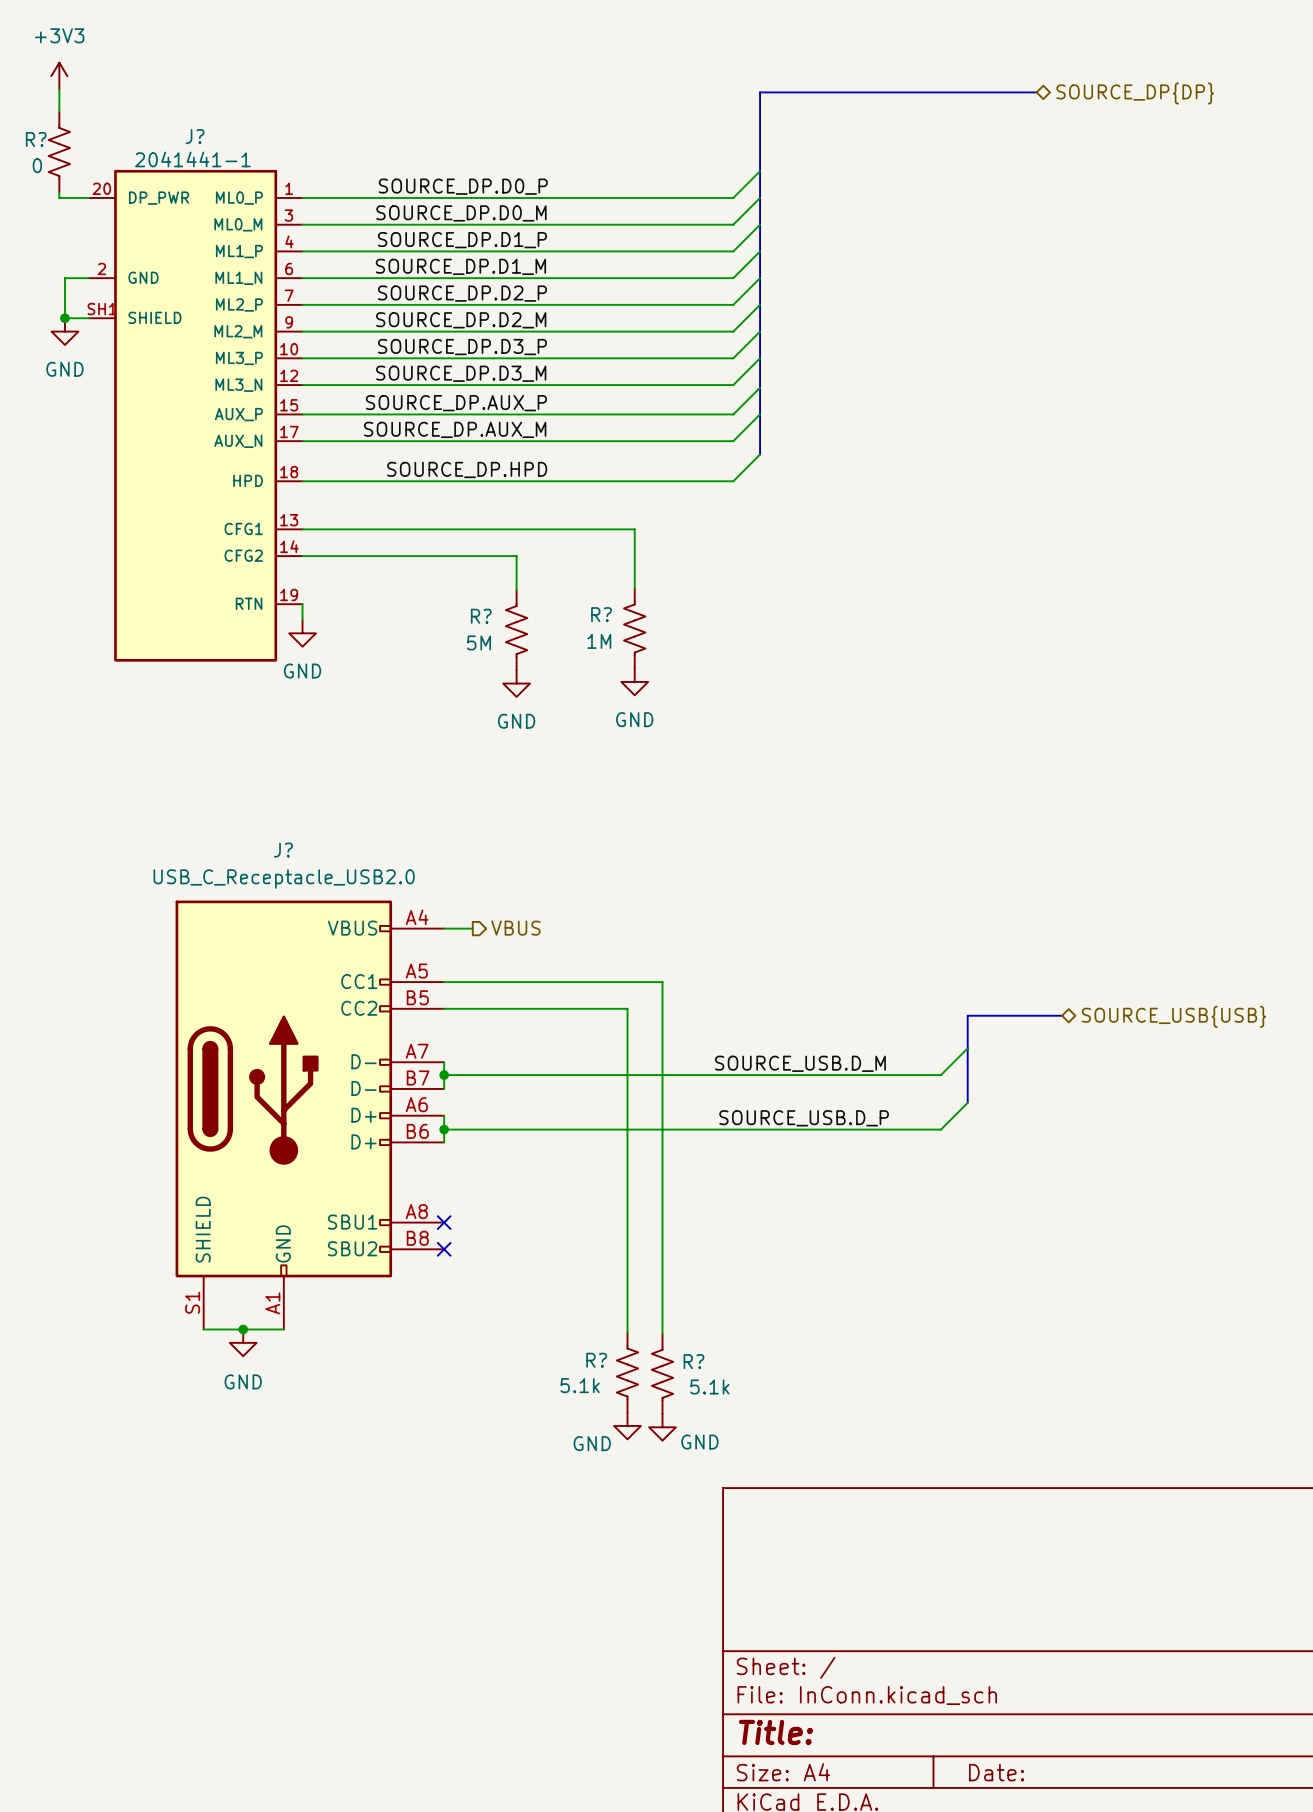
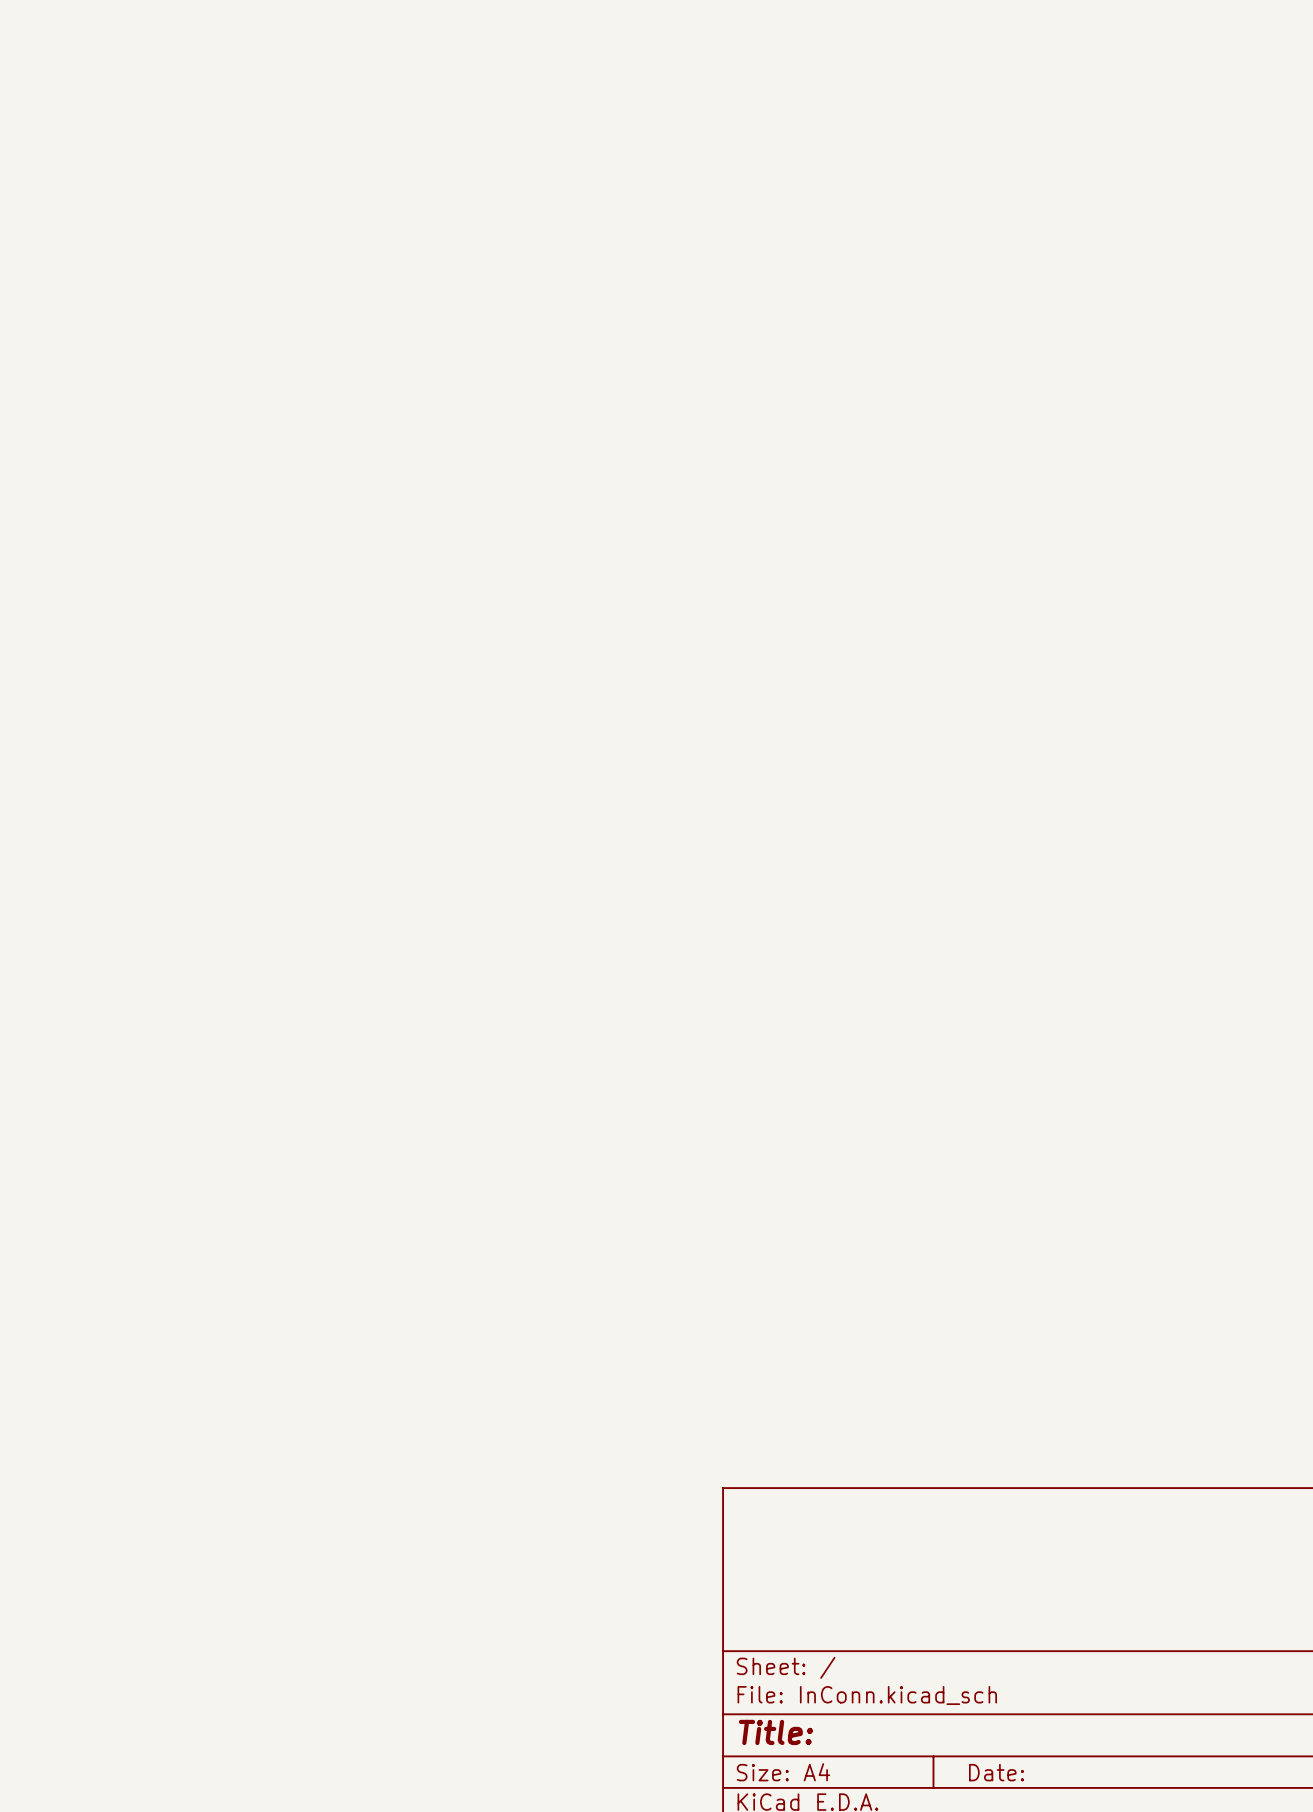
power symbol: +3V3 (59, 76) -> none
wire: (59, 89) (59, 111) -> none
bus: (1036, 92) (760, 92) (760, 454) -> none
hierarchical label: SOURCE_DP{DP} (1135, 93) -> none
R?: 0 (59, 152) -> none
wire: (760, 171) (733, 197) (302, 197) -> none
label: SOURCE_DP.D0_P (463, 186) -> none
wire: (59, 192) (59, 197) (88, 197) -> none
wire: (760, 197) (733, 224) (302, 224) -> none
label: SOURCE_DP.D0_M (461, 213) -> none
wire: (760, 224) (733, 251) (302, 251) -> none
label: SOURCE_DP.D1_P (462, 240) -> none
wire: (760, 251) (733, 278) (302, 278) -> none
label: SOURCE_DP.D1_M (460, 266) -> none
wire: (88, 278) (64, 278) (64, 318) (88, 318) -> none
wire: (760, 278) (733, 304) (302, 304) -> none
label: SOURCE_DP.D2_P (462, 293) -> none
wire: (760, 304) (733, 331) (302, 331) -> none
junction: (64, 318) -> none
label: SOURCE_DP.D2_M (461, 320) -> none
power symbol: GND (64, 331) -> none
wire: (760, 331) (733, 358) (302, 358) -> none
label: SOURCE_DP.D3_P (462, 347) -> none
wire: (760, 358) (733, 385) (302, 385) -> none
label: SOURCE_DP.D3_M (461, 373) -> none
wire: (760, 387) (733, 414) (302, 414) -> none
label: SOURCE_DP.AUX_P (456, 403) -> none
wire: (760, 414) (733, 441) (302, 441) -> none
J?: 2041441-1 (195, 415) -> none
label: SOURCE_DP.AUX_M (455, 429) -> none
wire: (760, 454) (733, 481) (302, 481) -> none
label: SOURCE_DP.HPD (467, 469) -> none
wire: (302, 529) (634, 529) (634, 588) -> none
wire: (302, 556) (516, 556) (516, 590) -> none
wire: (302, 604) (302, 619) -> none
R?: 1M (634, 628) -> none
R?: 5M (516, 630) -> none
power symbol: GND (302, 633) -> none
power symbol: GND (634, 681) -> none
power symbol: GND (516, 683) -> none
wire: (444, 928) (472, 928) -> none
hierarchical label: VBUS (515, 928) -> none
wire: (444, 982) (662, 982) (662, 1333) -> none
wire: (444, 1008) (627, 1008) (627, 1332) -> none
bus: (1062, 1015) (967, 1015) (967, 1102) -> none
hierarchical label: SOURCE_USB{USB} (1173, 1016) -> none
wire: (967, 1048) (940, 1075) (444, 1075) -> none
wire: (444, 1062) (444, 1088) -> none
label: SOURCE_USB.D_M (800, 1063) -> none
junction: (444, 1075) -> none
wire: (967, 1102) (940, 1129) (444, 1129) -> none
J?: USB_C_Receptacle_USB2.0 (309, 1115) -> none
wire: (444, 1115) (444, 1142) -> none
label: SOURCE_USB.D_P (804, 1118) -> none
junction: (444, 1129) -> none
no-connect mark: (444, 1222) -> none
no-connect mark: (444, 1249) -> none
wire: (203, 1329) (283, 1329) -> none
junction: (243, 1329) -> none
power symbol: GND (243, 1342) -> none
R?: 5.1k (627, 1372) -> none
R?: 5.1k (662, 1373) -> none
power symbol: GND (627, 1425) -> none
power symbol: GND (662, 1427) -> none

